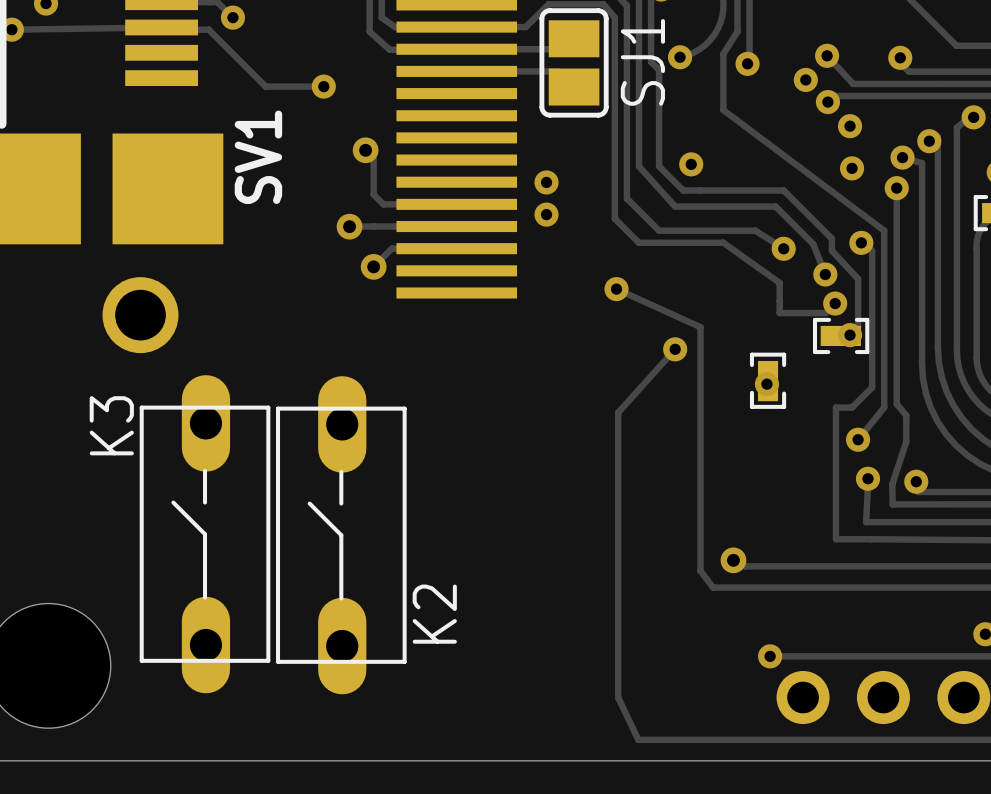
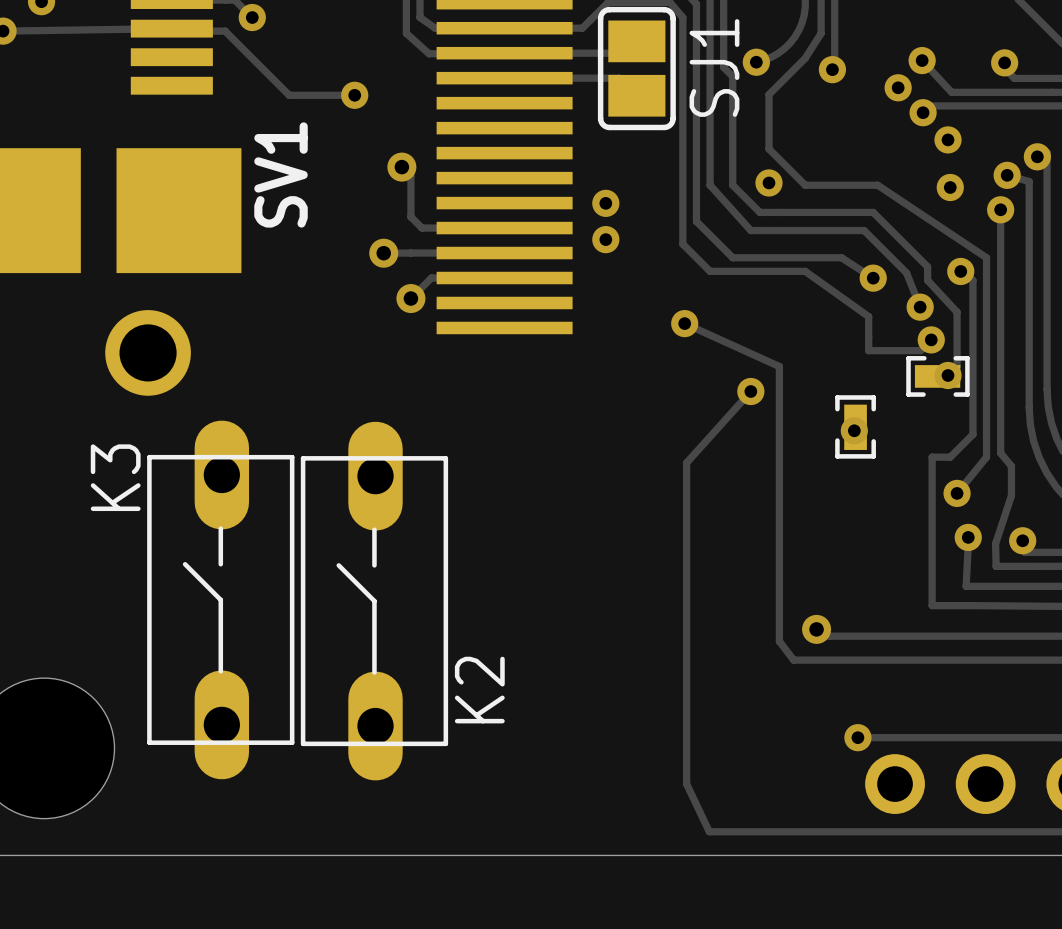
track: (723, 53) (723, 110) (884, 230) -> (805, 58) (768, 94) (768, 148) (805, 185) (877, 185) (986, 257)

